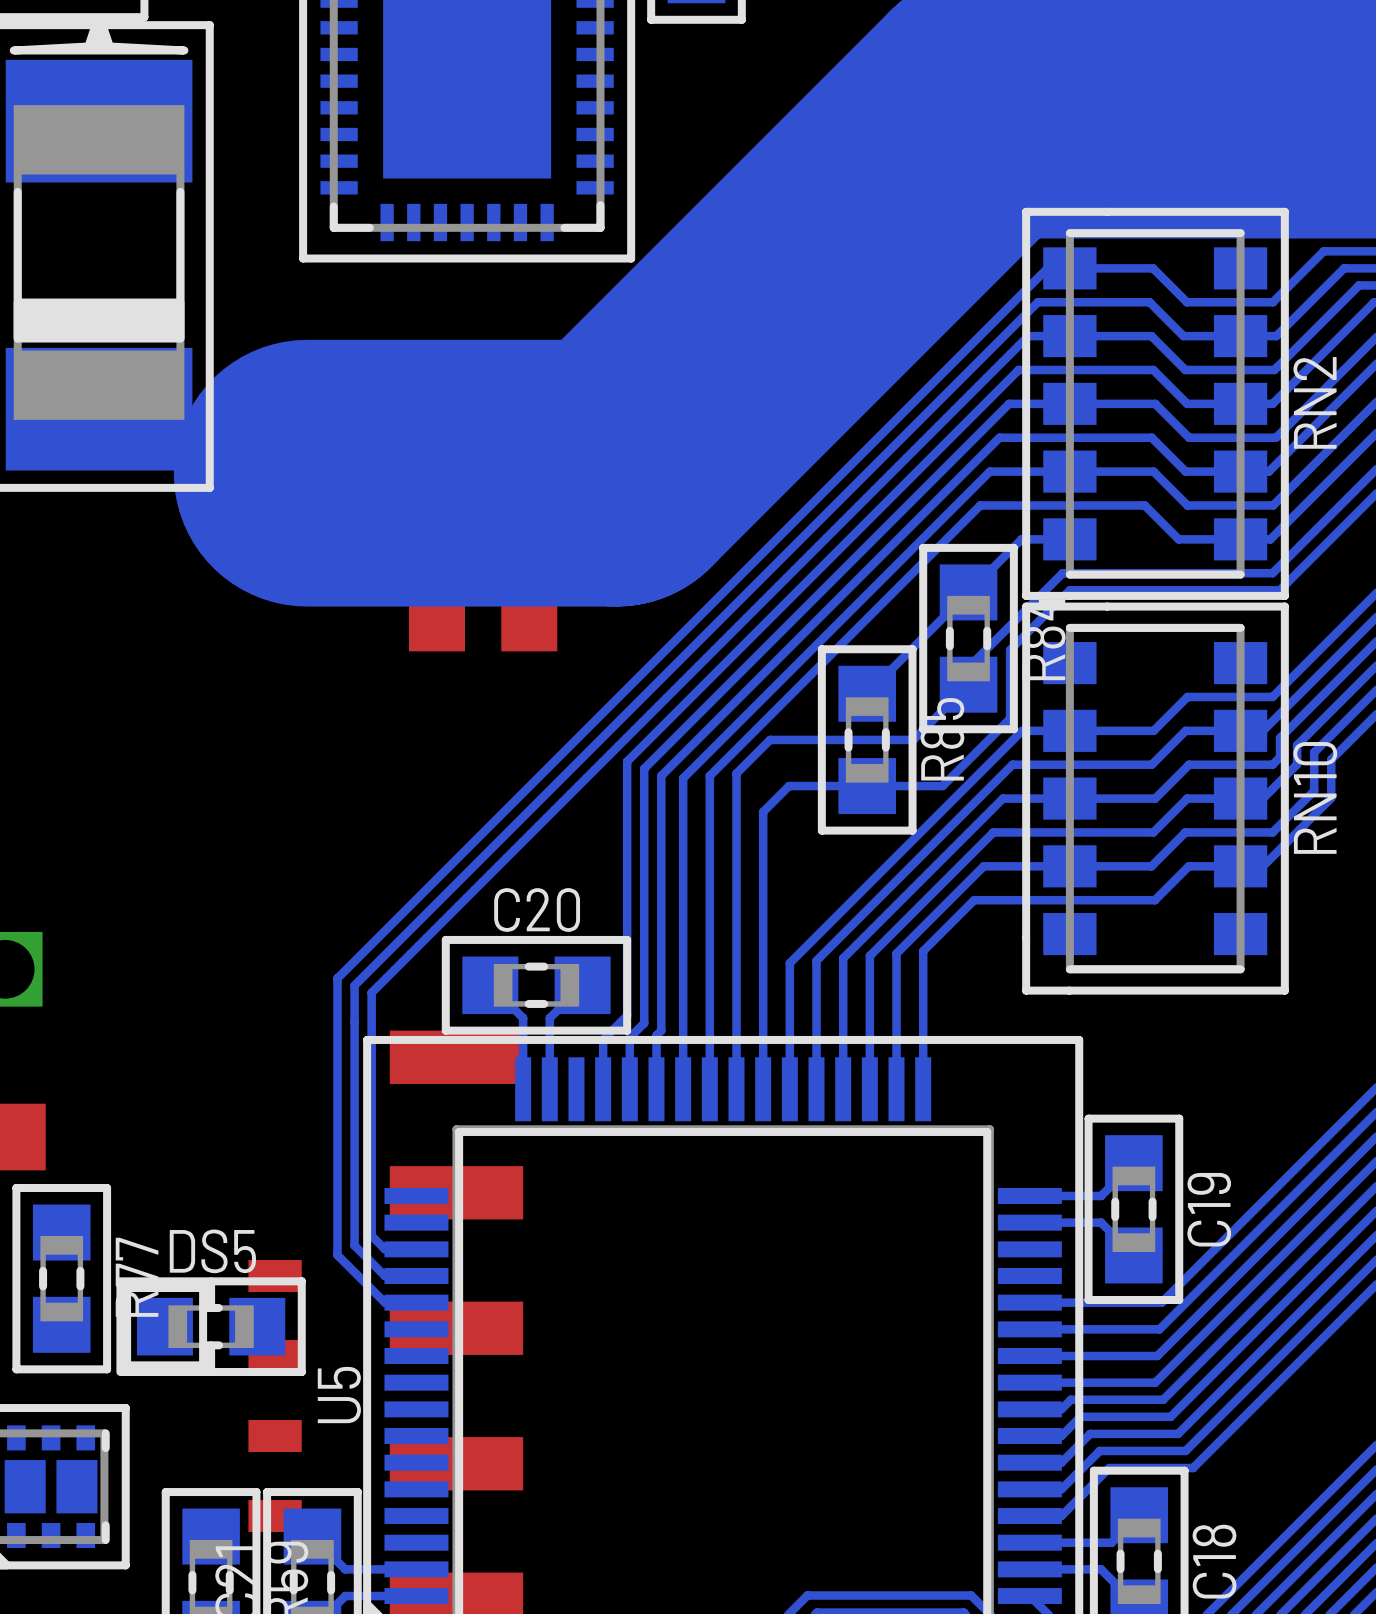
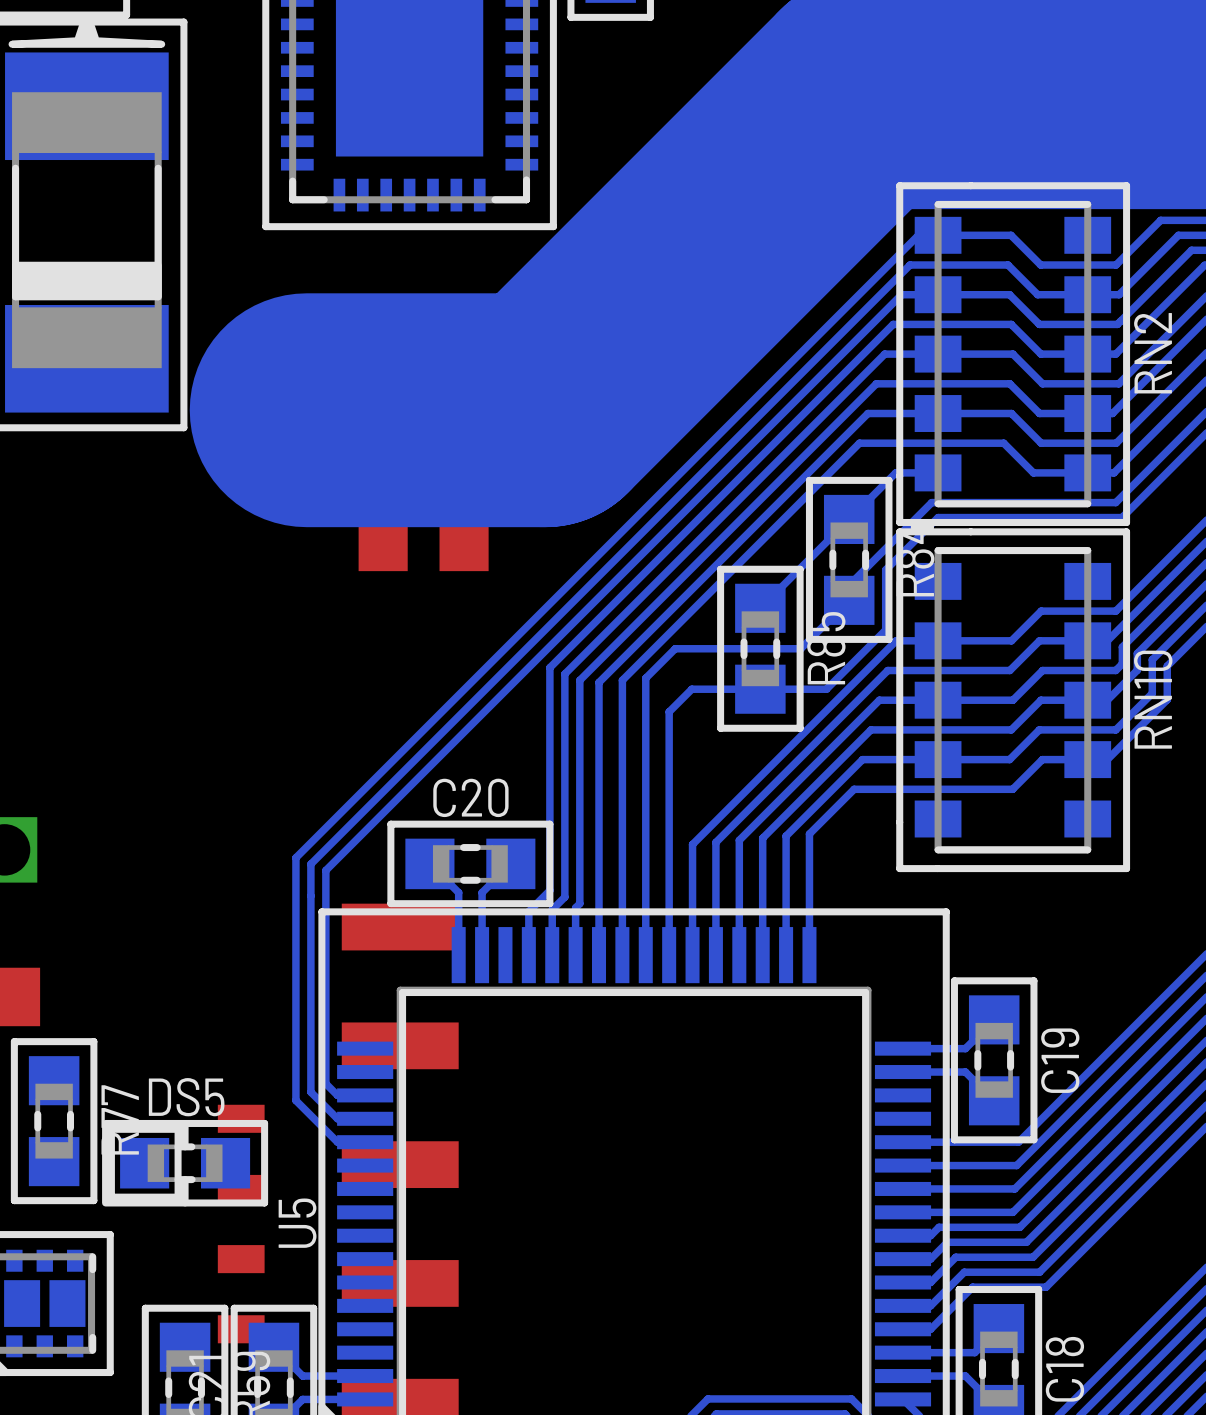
bottom track: (621, 467) (616, 473) (307, 473) -> (545, 410) (306, 410)

